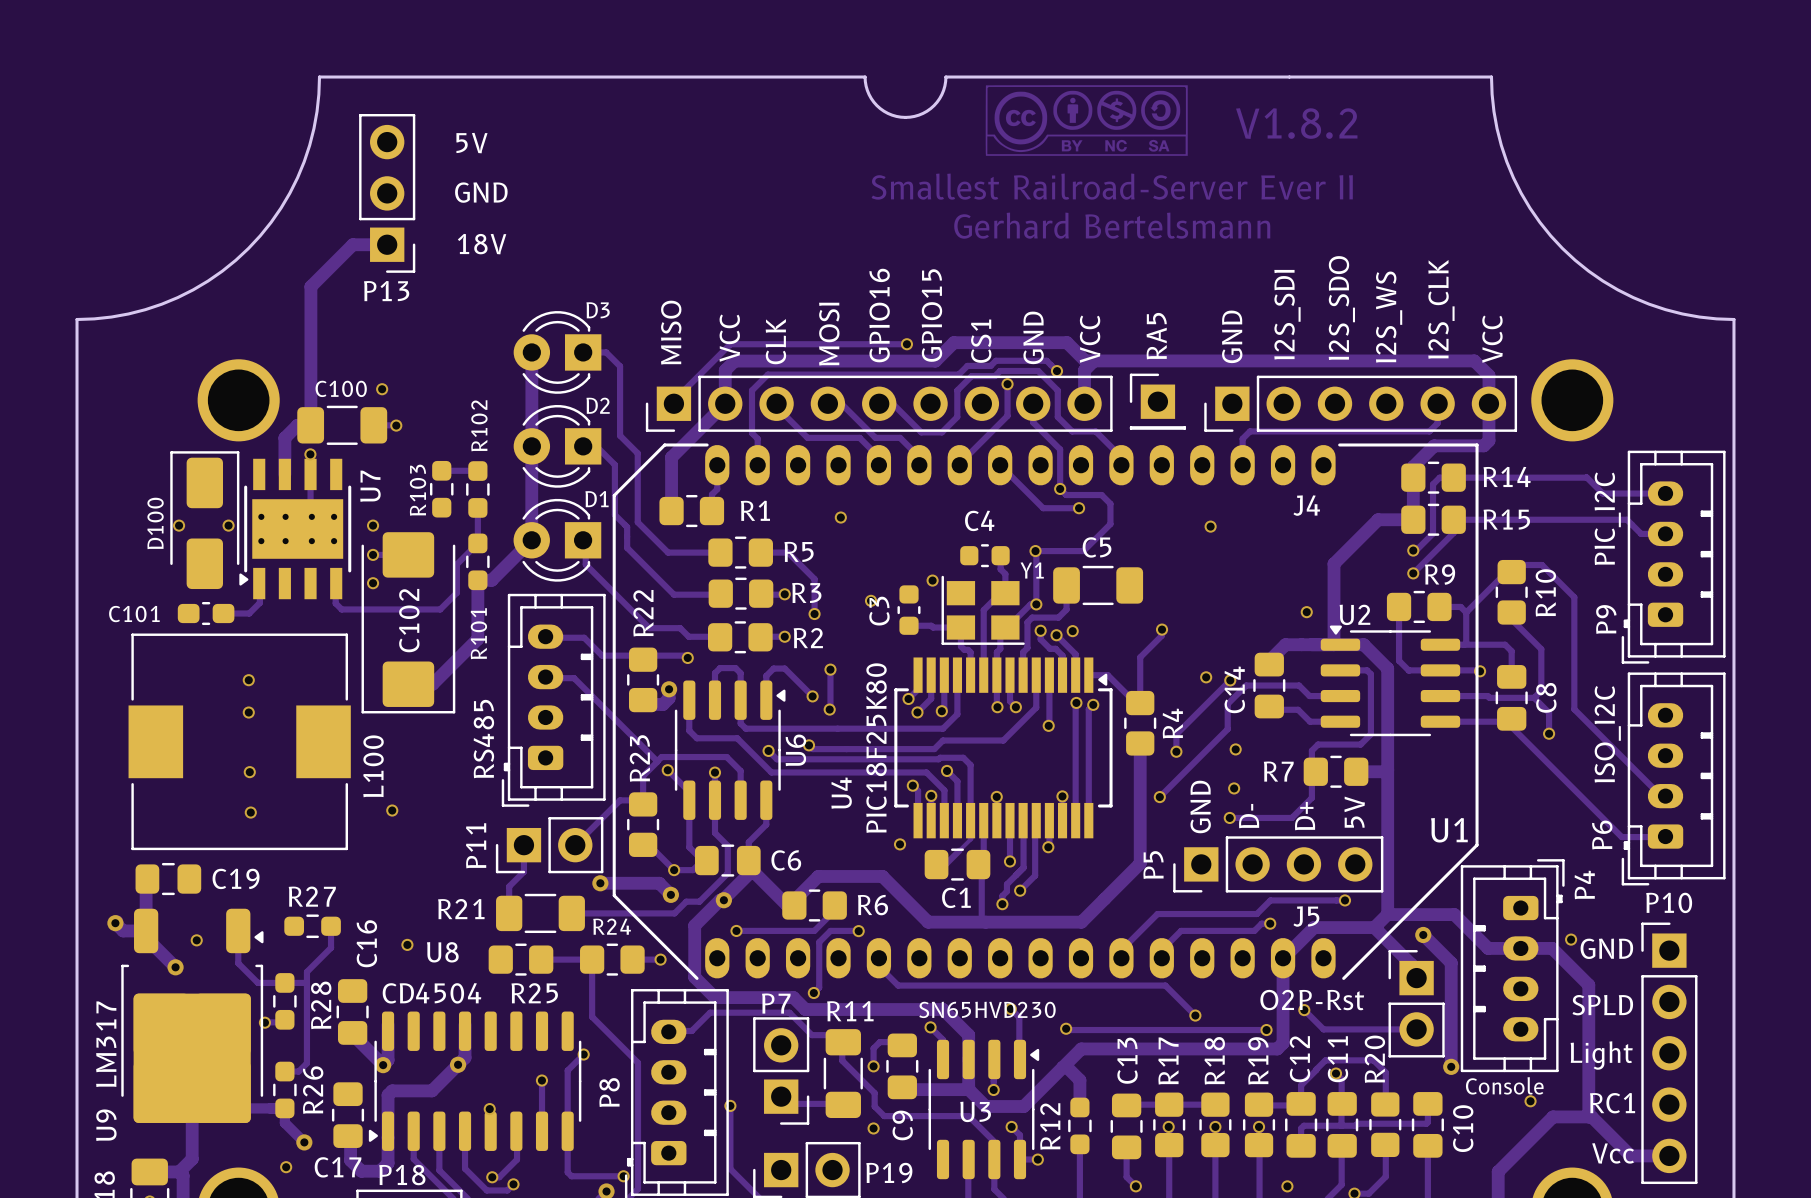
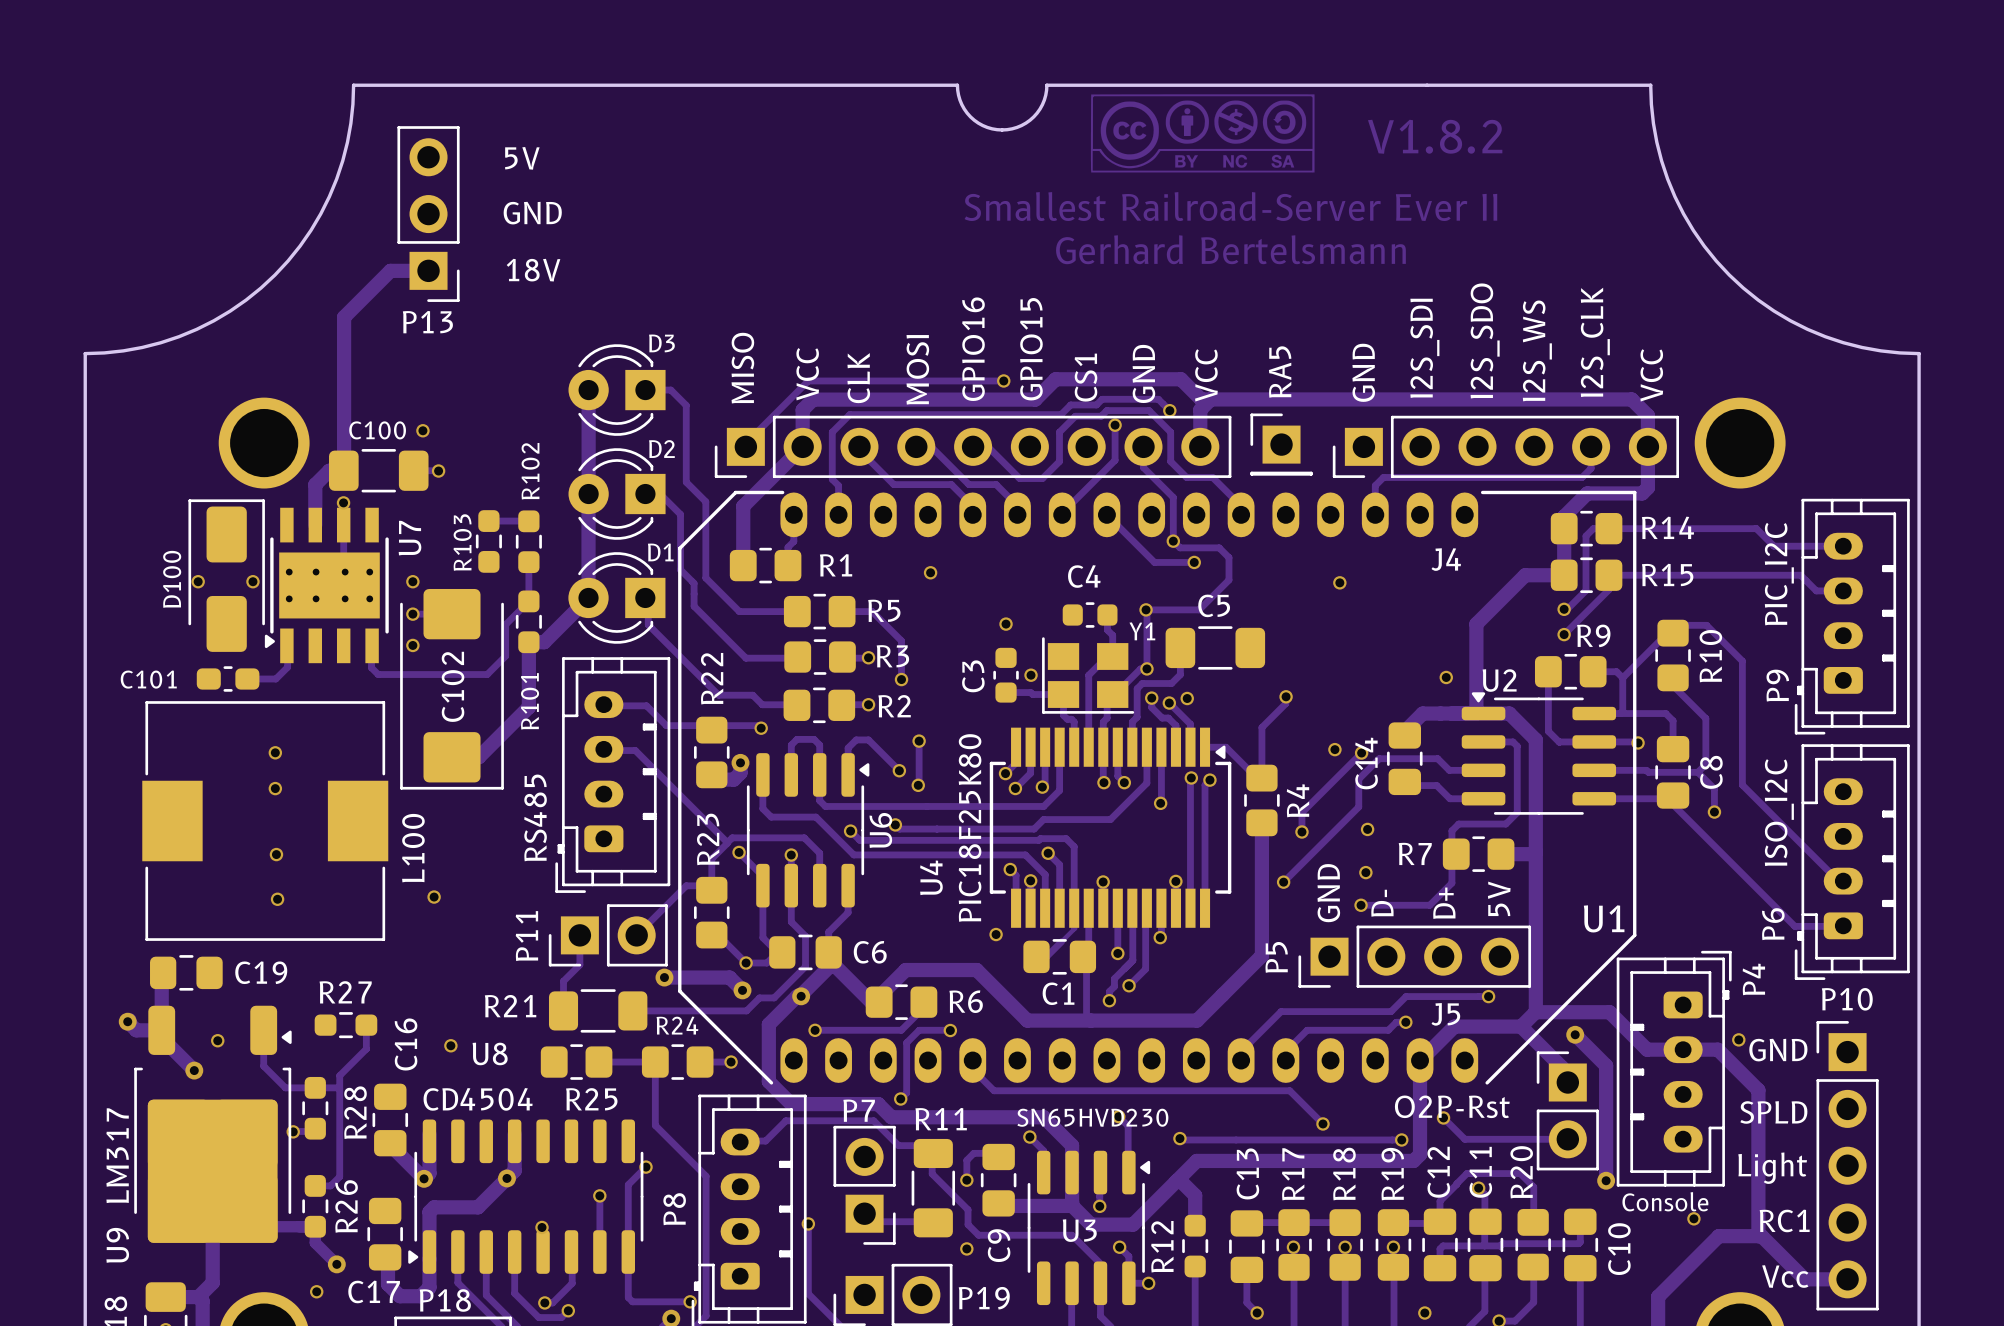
via: none -> (1006, 624)
via: (932, 580) -> none
via: (871, 600) -> none
via: none -> (1031, 675)

